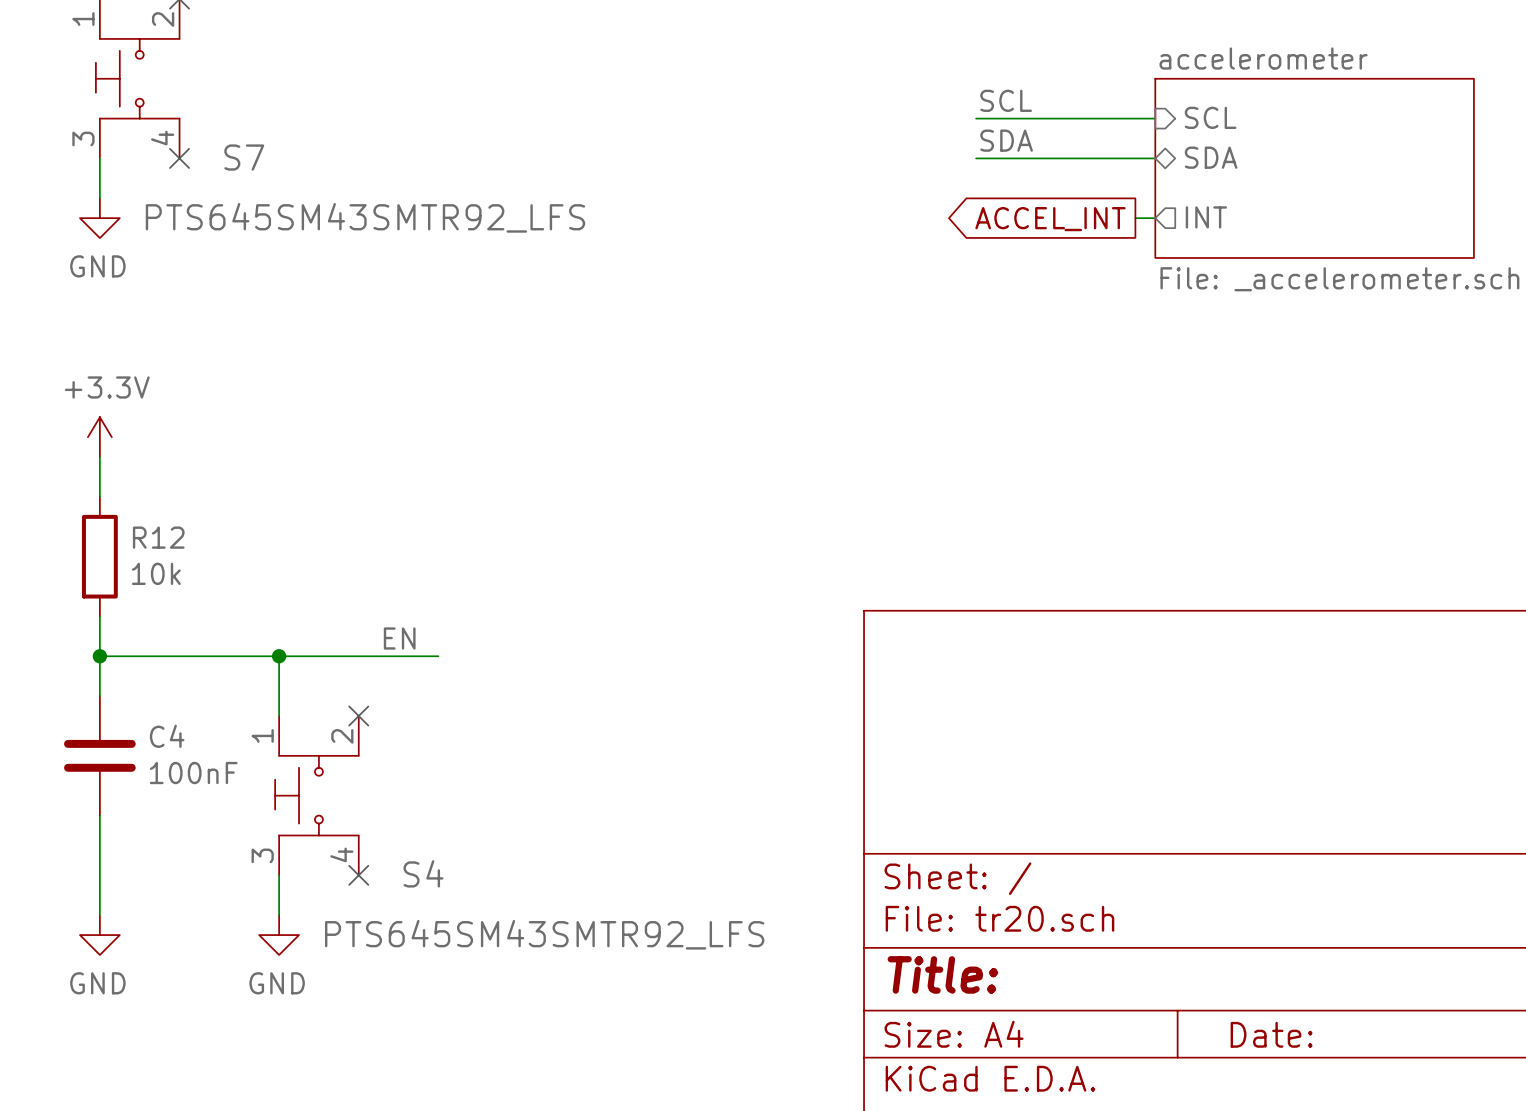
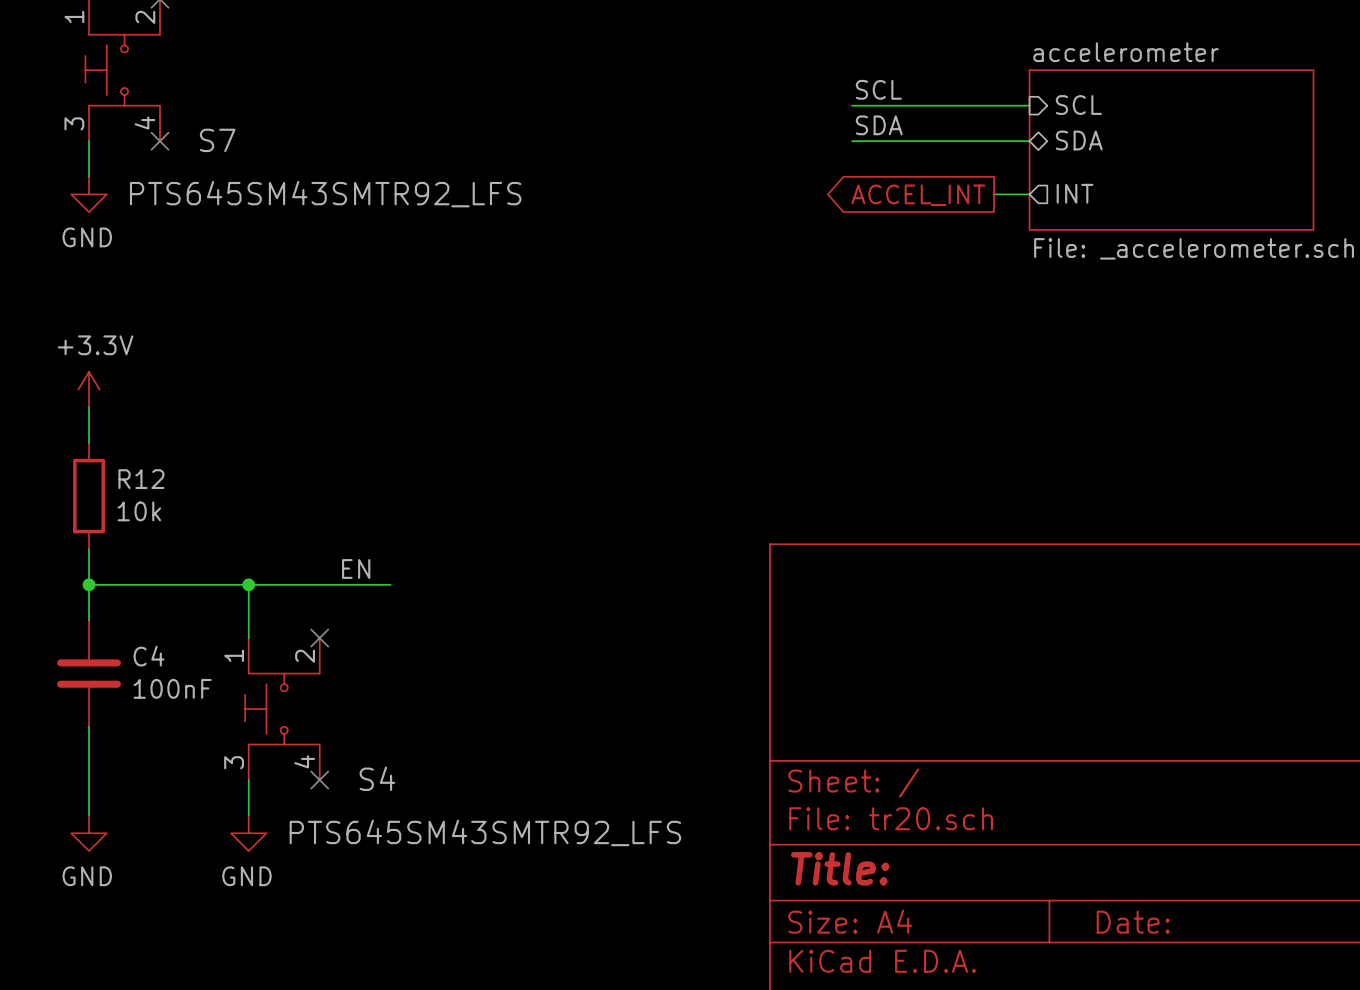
label position: SCL (1006, 100) -> SCL (878, 89)
wire: none -> (852, 105) (869, 105)
label position: SDA (1006, 140) -> SDA (879, 125)
wire: none -> (852, 141) (869, 141)
wire: none -> (994, 194) (1011, 194)
global label position: ACCEL_INT (1050, 219) -> ACCEL_INT (918, 195)

